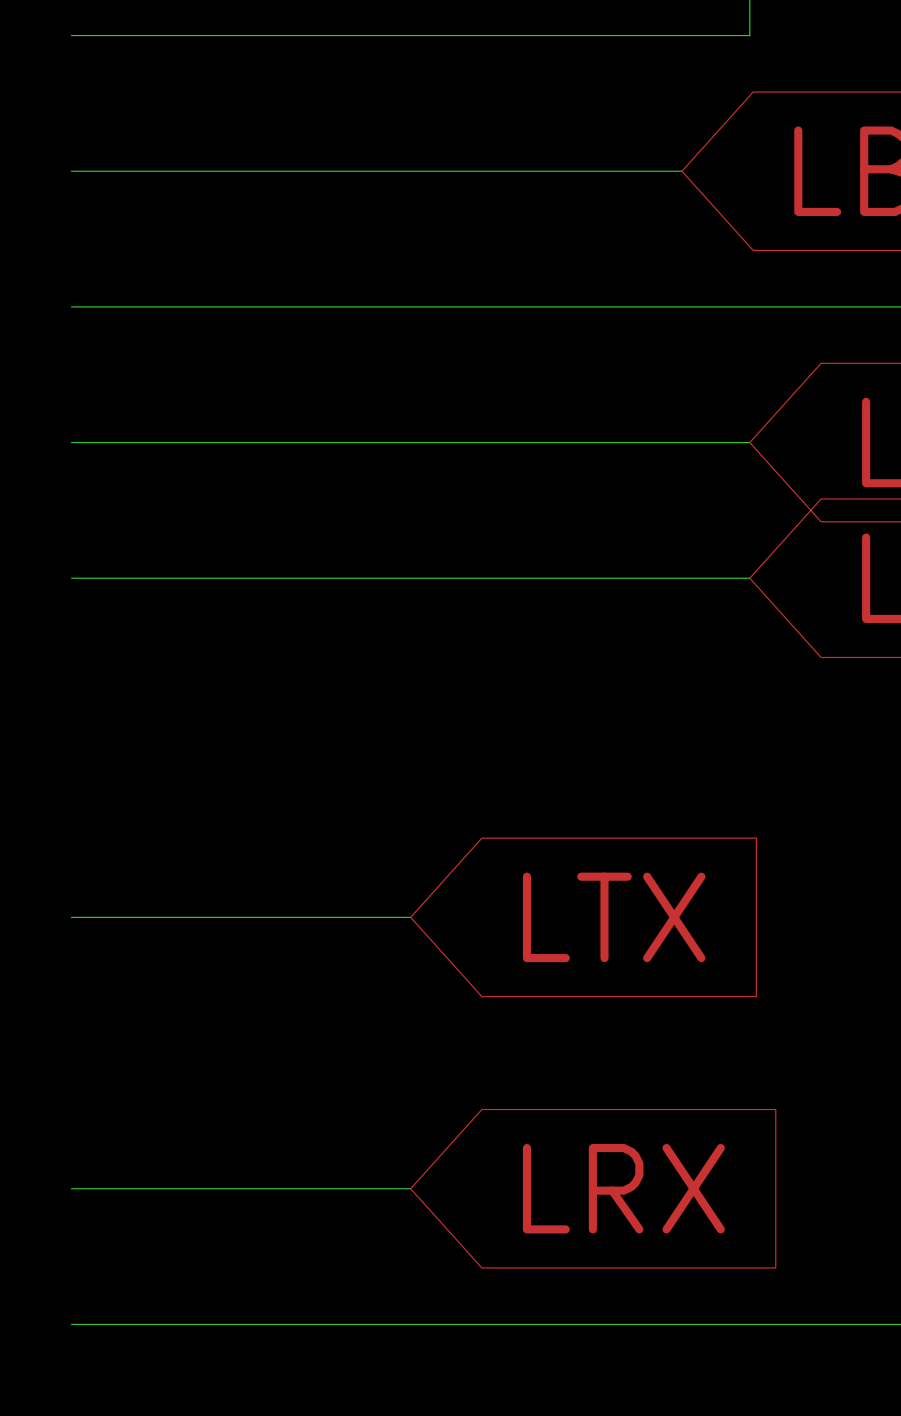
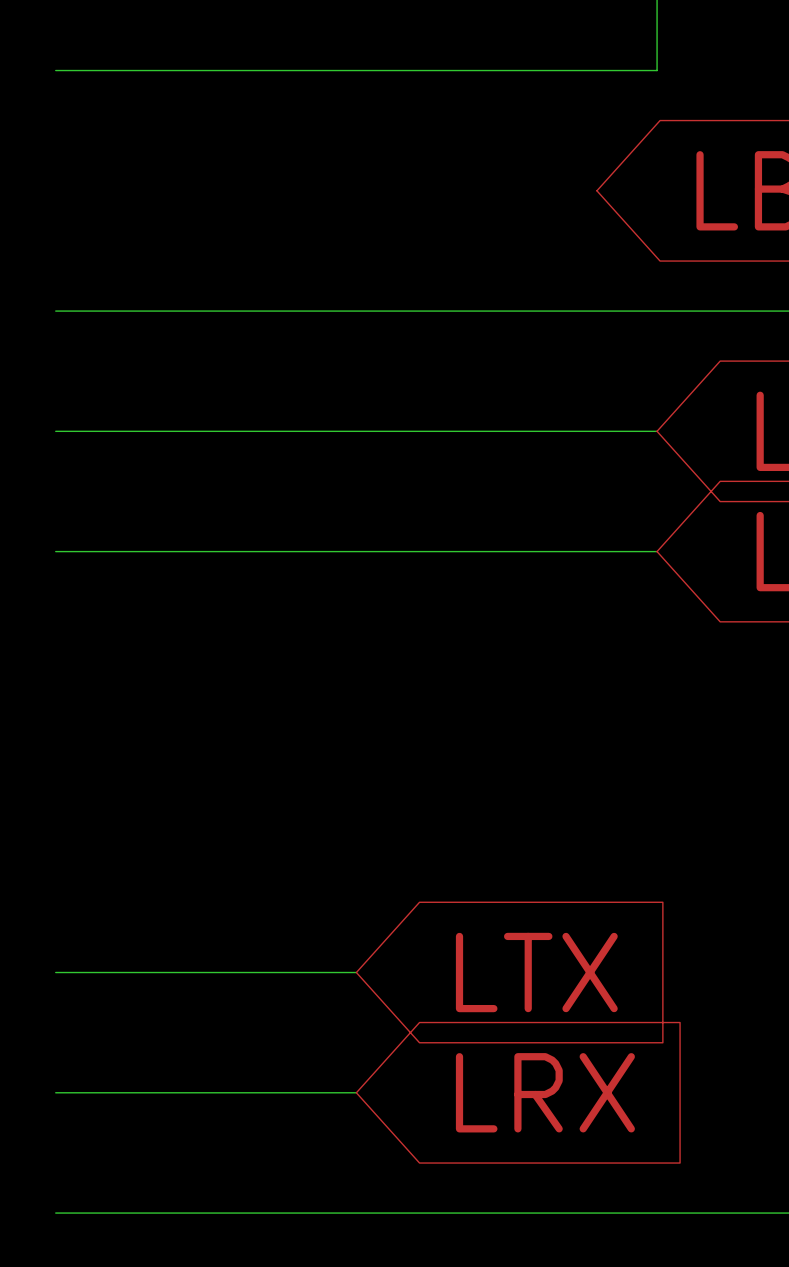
wire: (71, 171) (682, 171) -> none
wire: (71, 917) (410, 917) -> (55, 972) (356, 972)
global label position: LTX (614, 917) -> LTX (536, 972)

